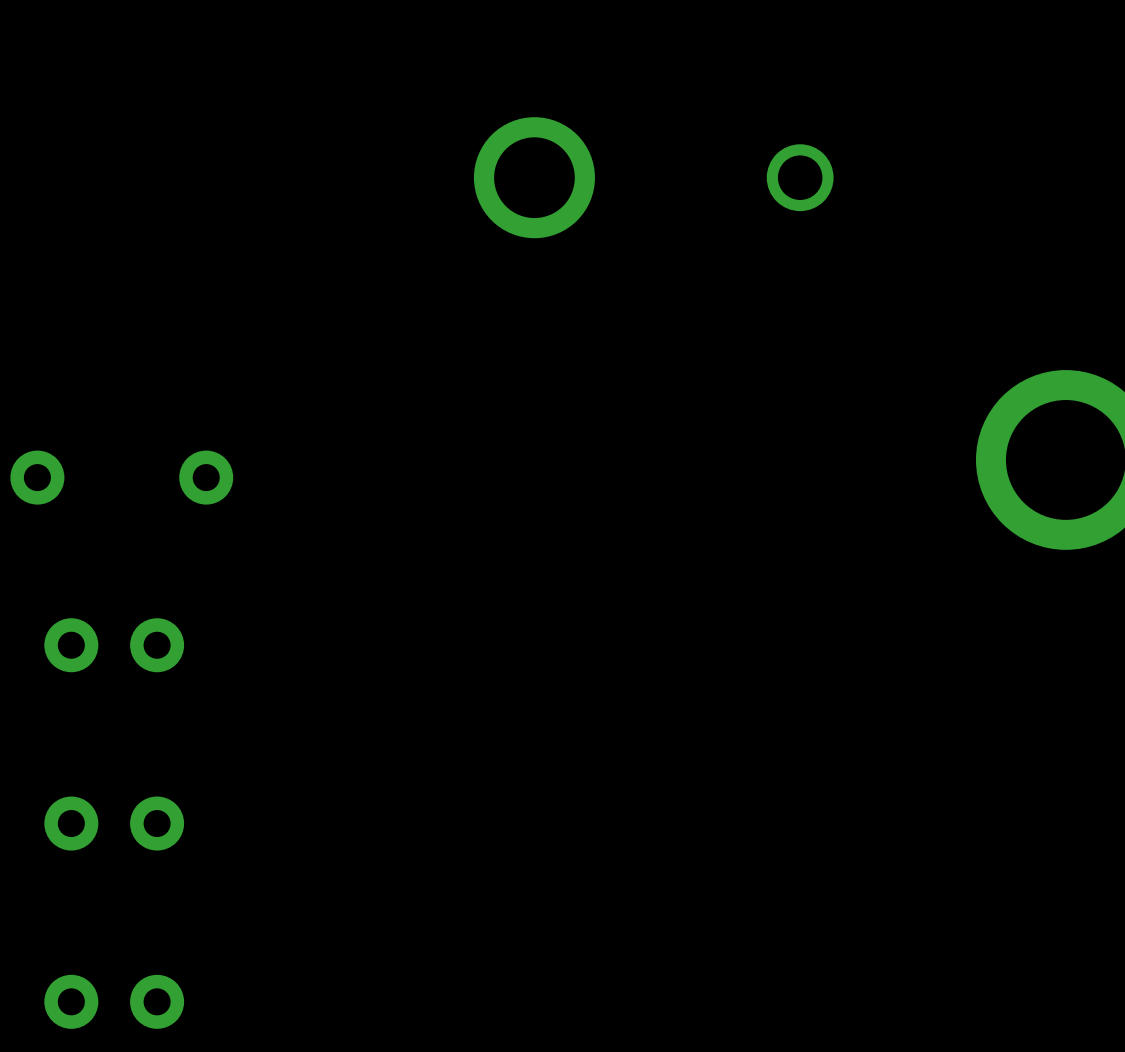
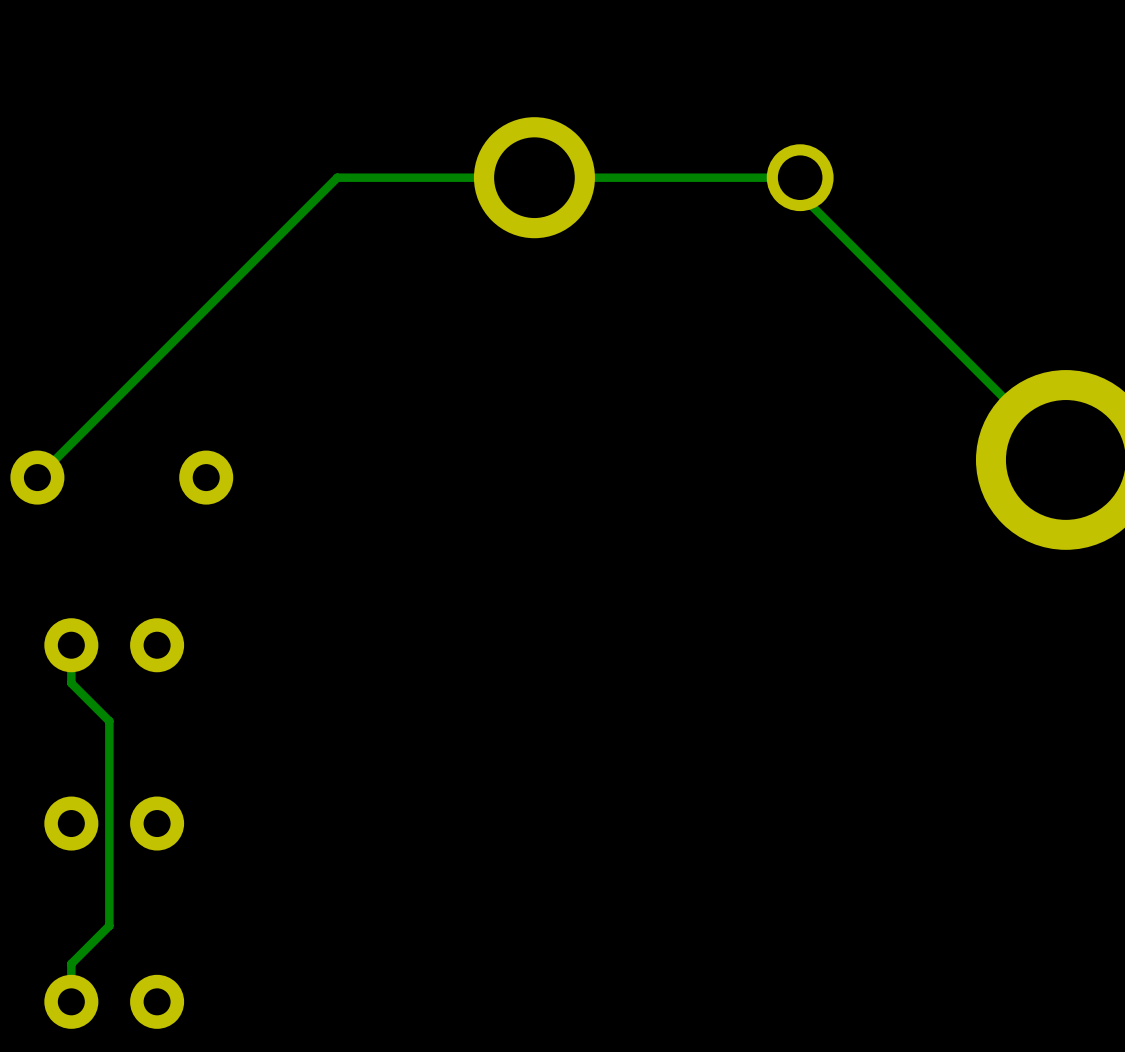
track: none -> (800, 177) (337, 177) (37, 477)
track: none -> (800, 194) (1065, 459)
track: none -> (71, 645) (71, 683) (109, 721) (109, 925) (71, 963) (71, 1001)

